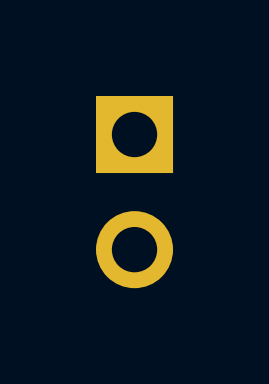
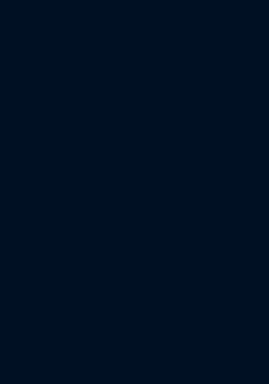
part: (134, 192) -> none

